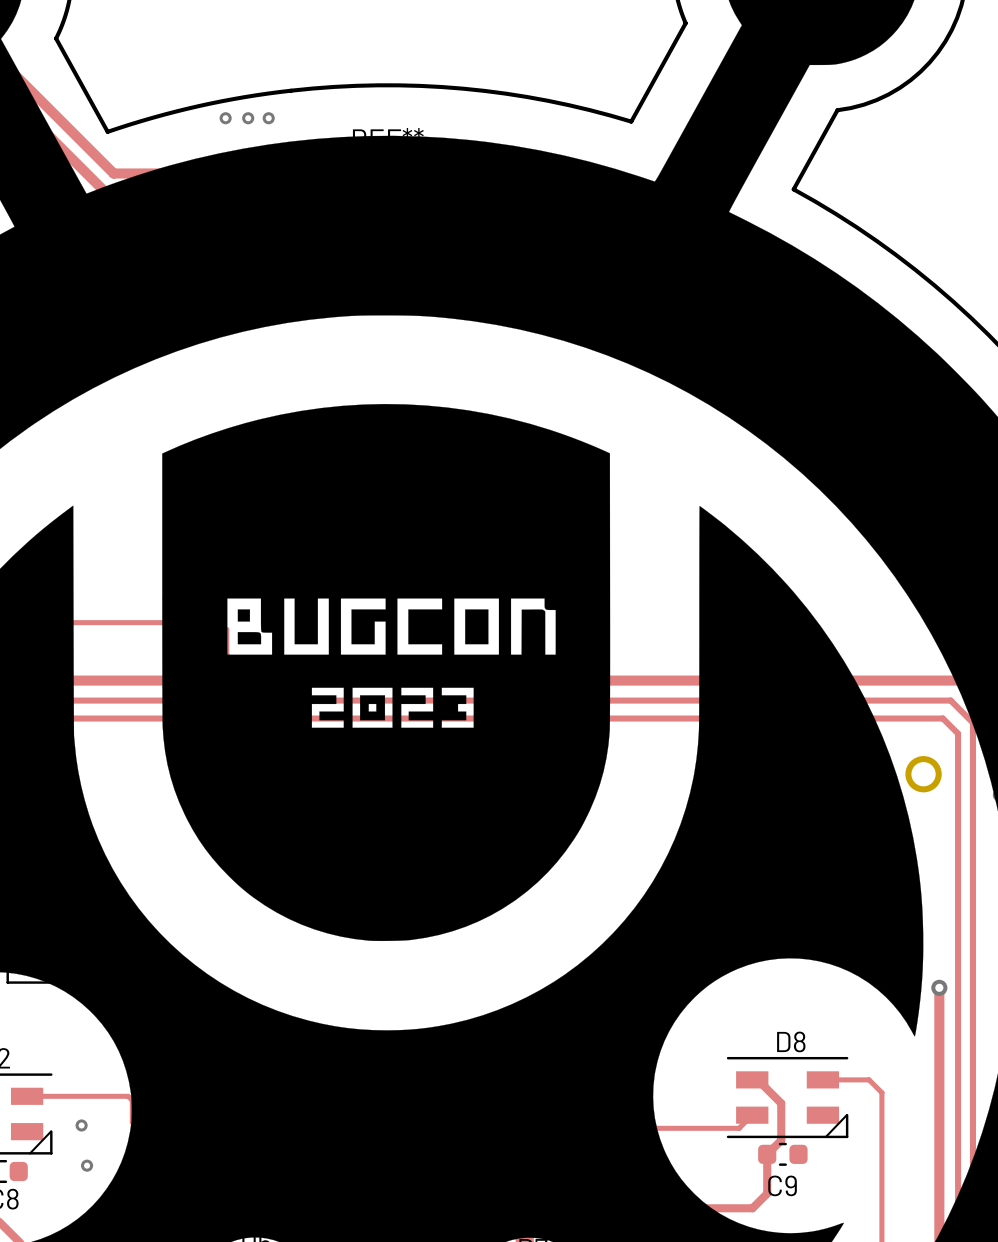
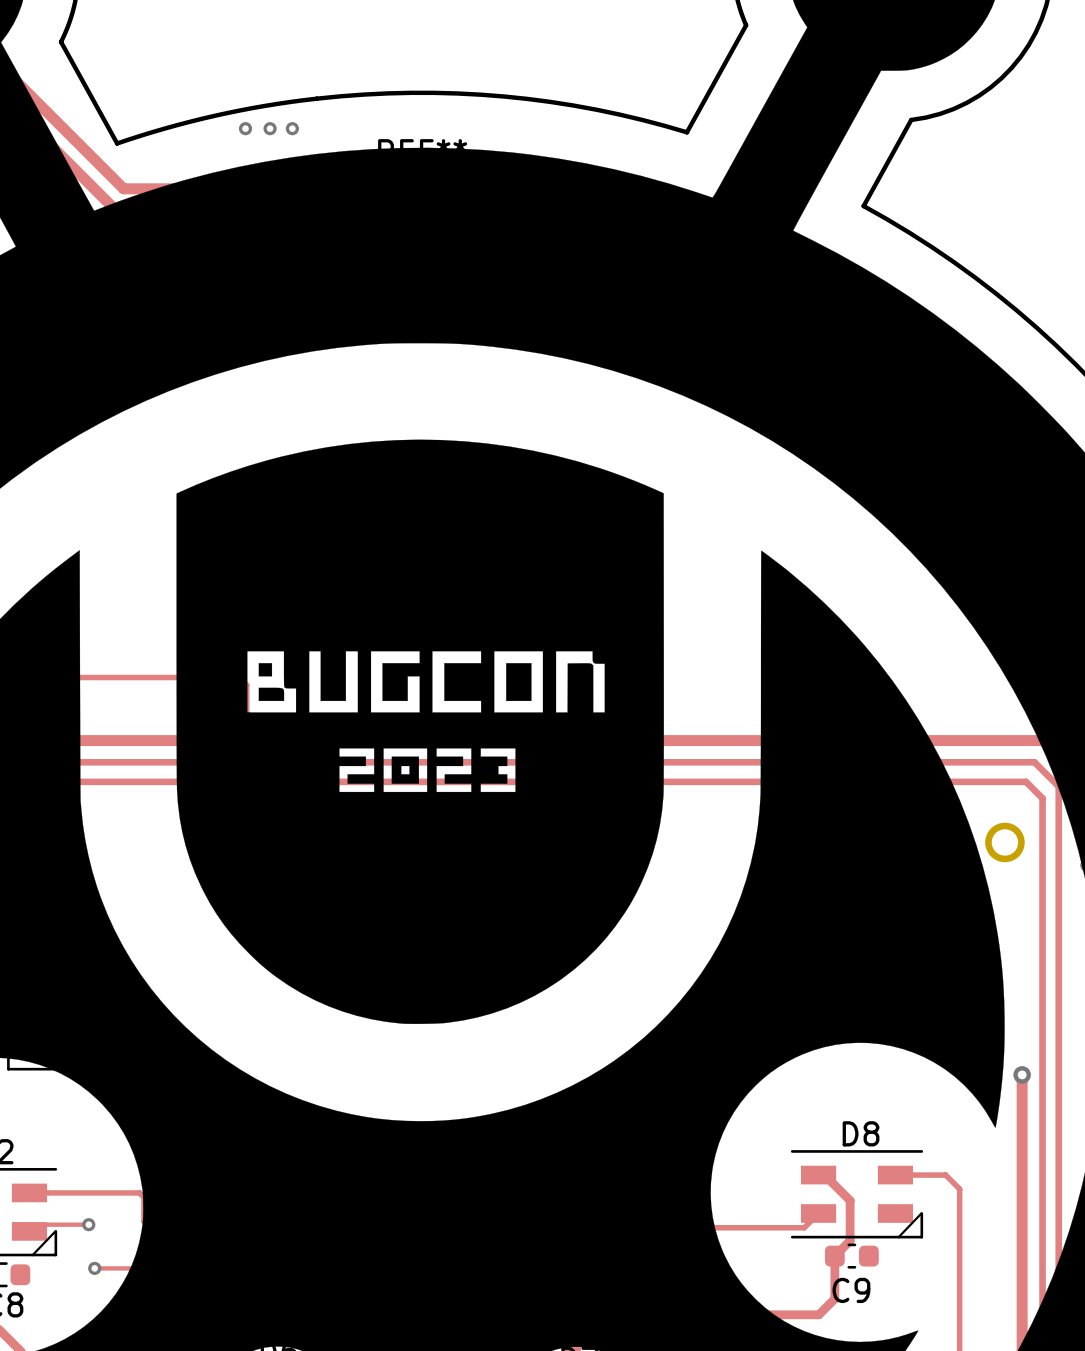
track: none -> (36, 1224) (88, 1224)
track: none -> (94, 1268) (150, 1268)

